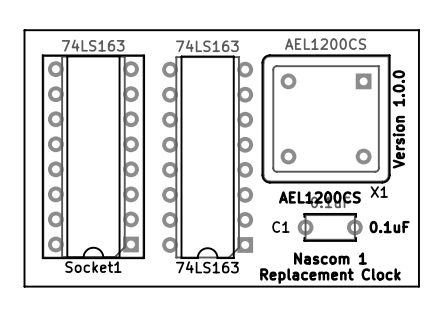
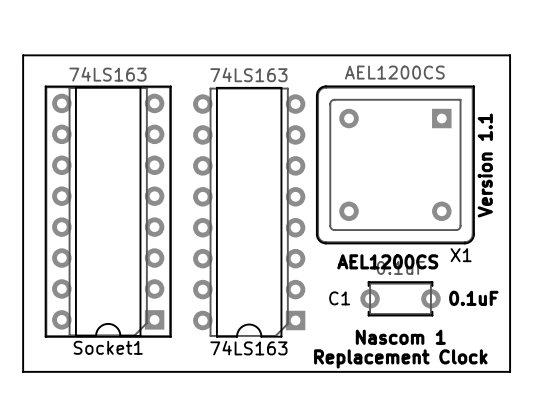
text: Version 1.0.0 (398, 119) -> Version 1.1 (485, 165)

